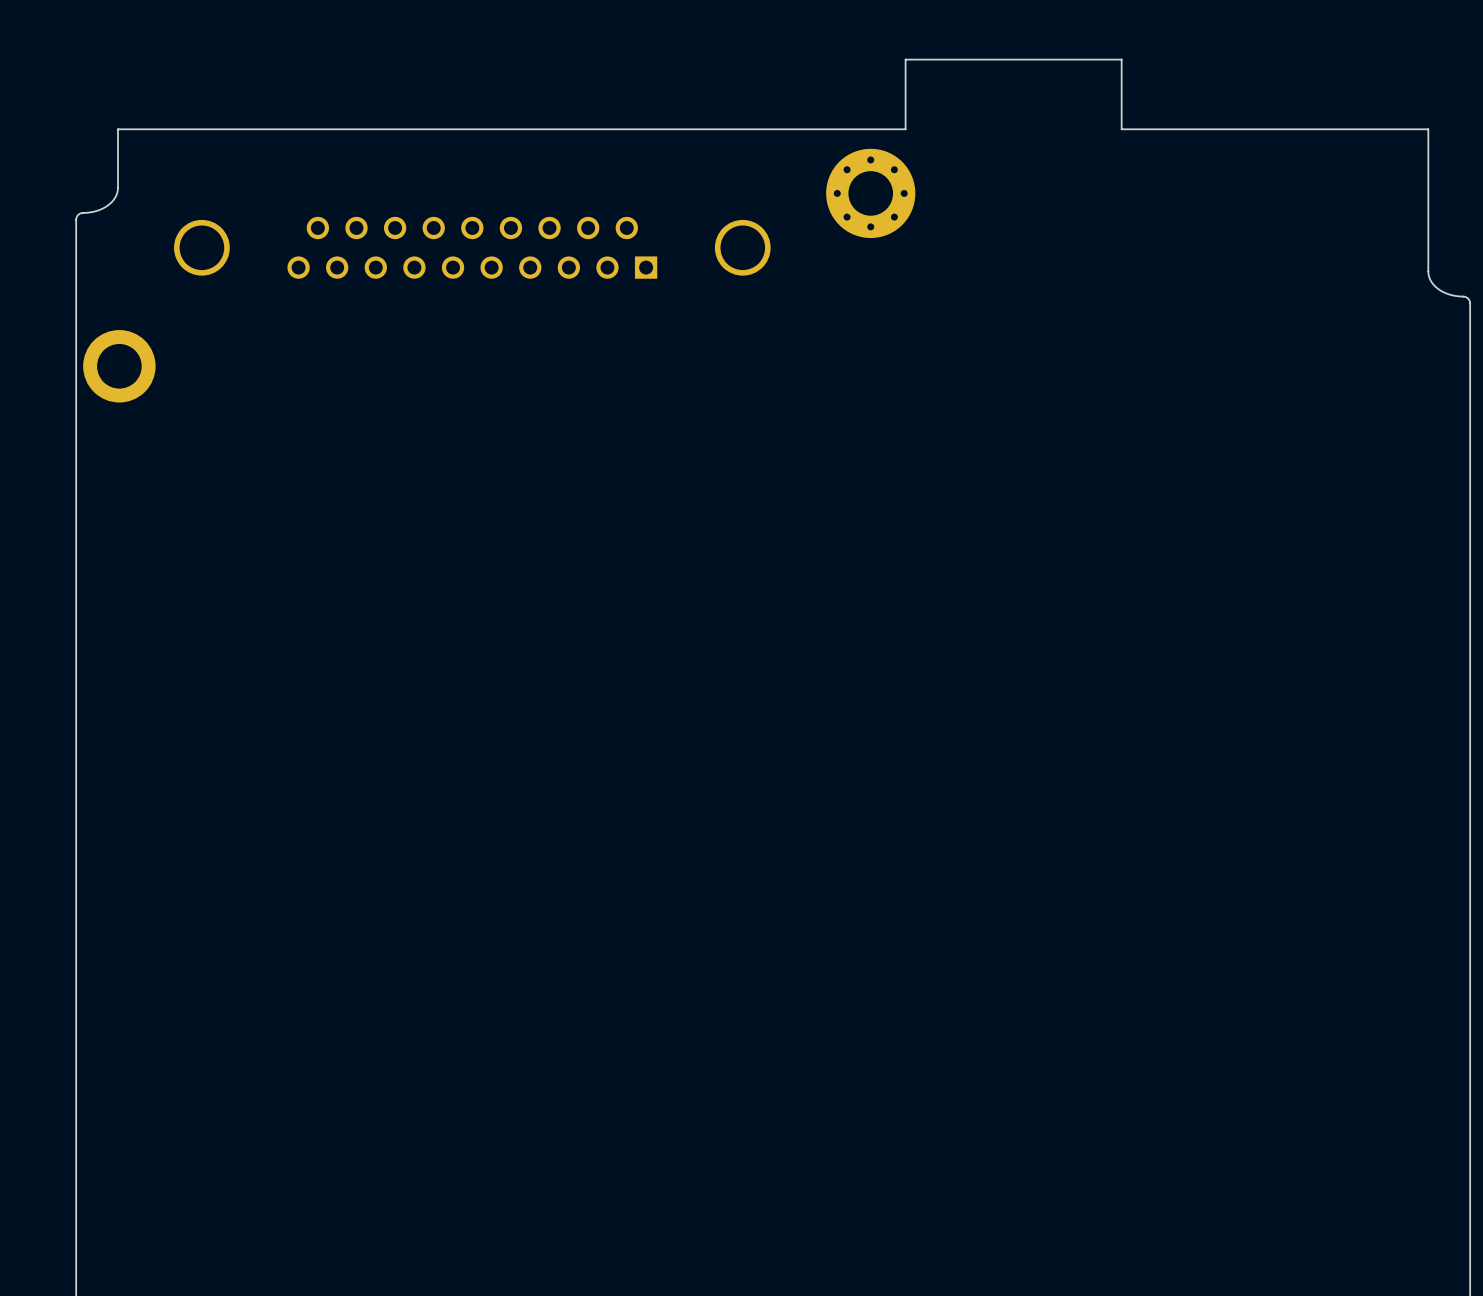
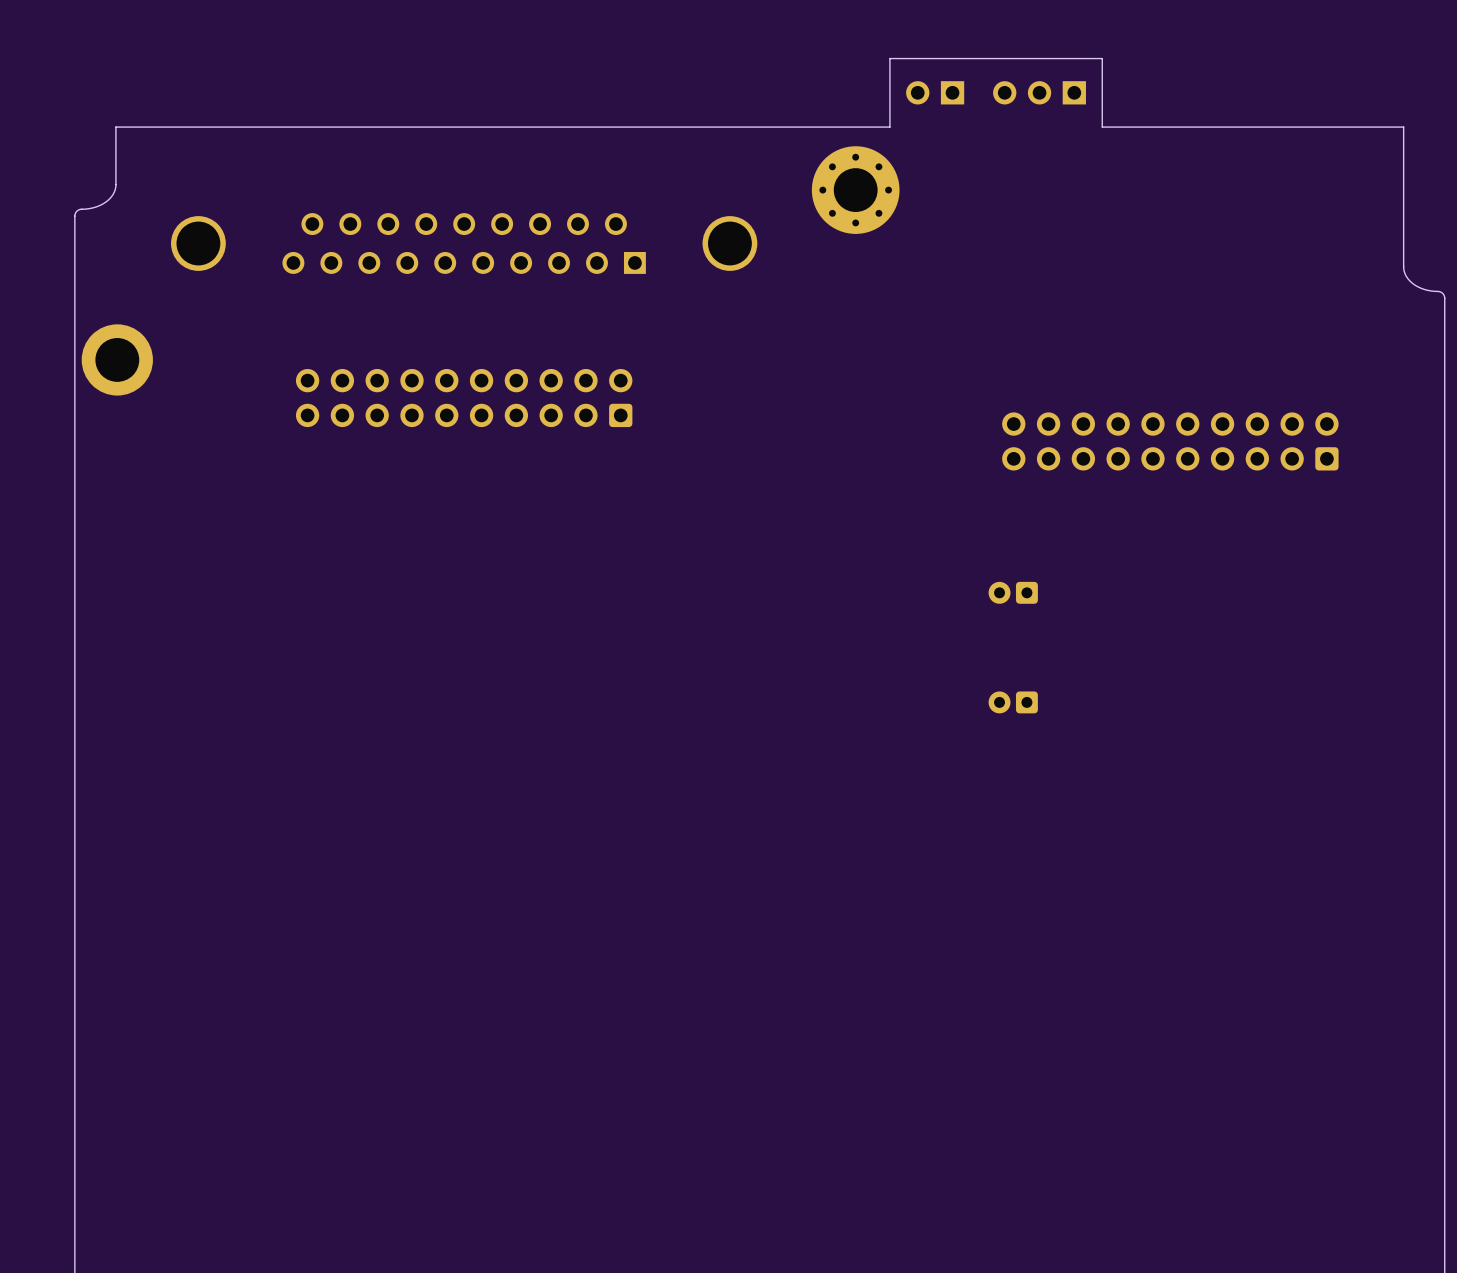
part: none -> (935, 92)
part: none -> (1039, 92)
part: none -> (464, 398)
part: none -> (1170, 441)
part: none -> (1013, 592)
part: none -> (1013, 702)

